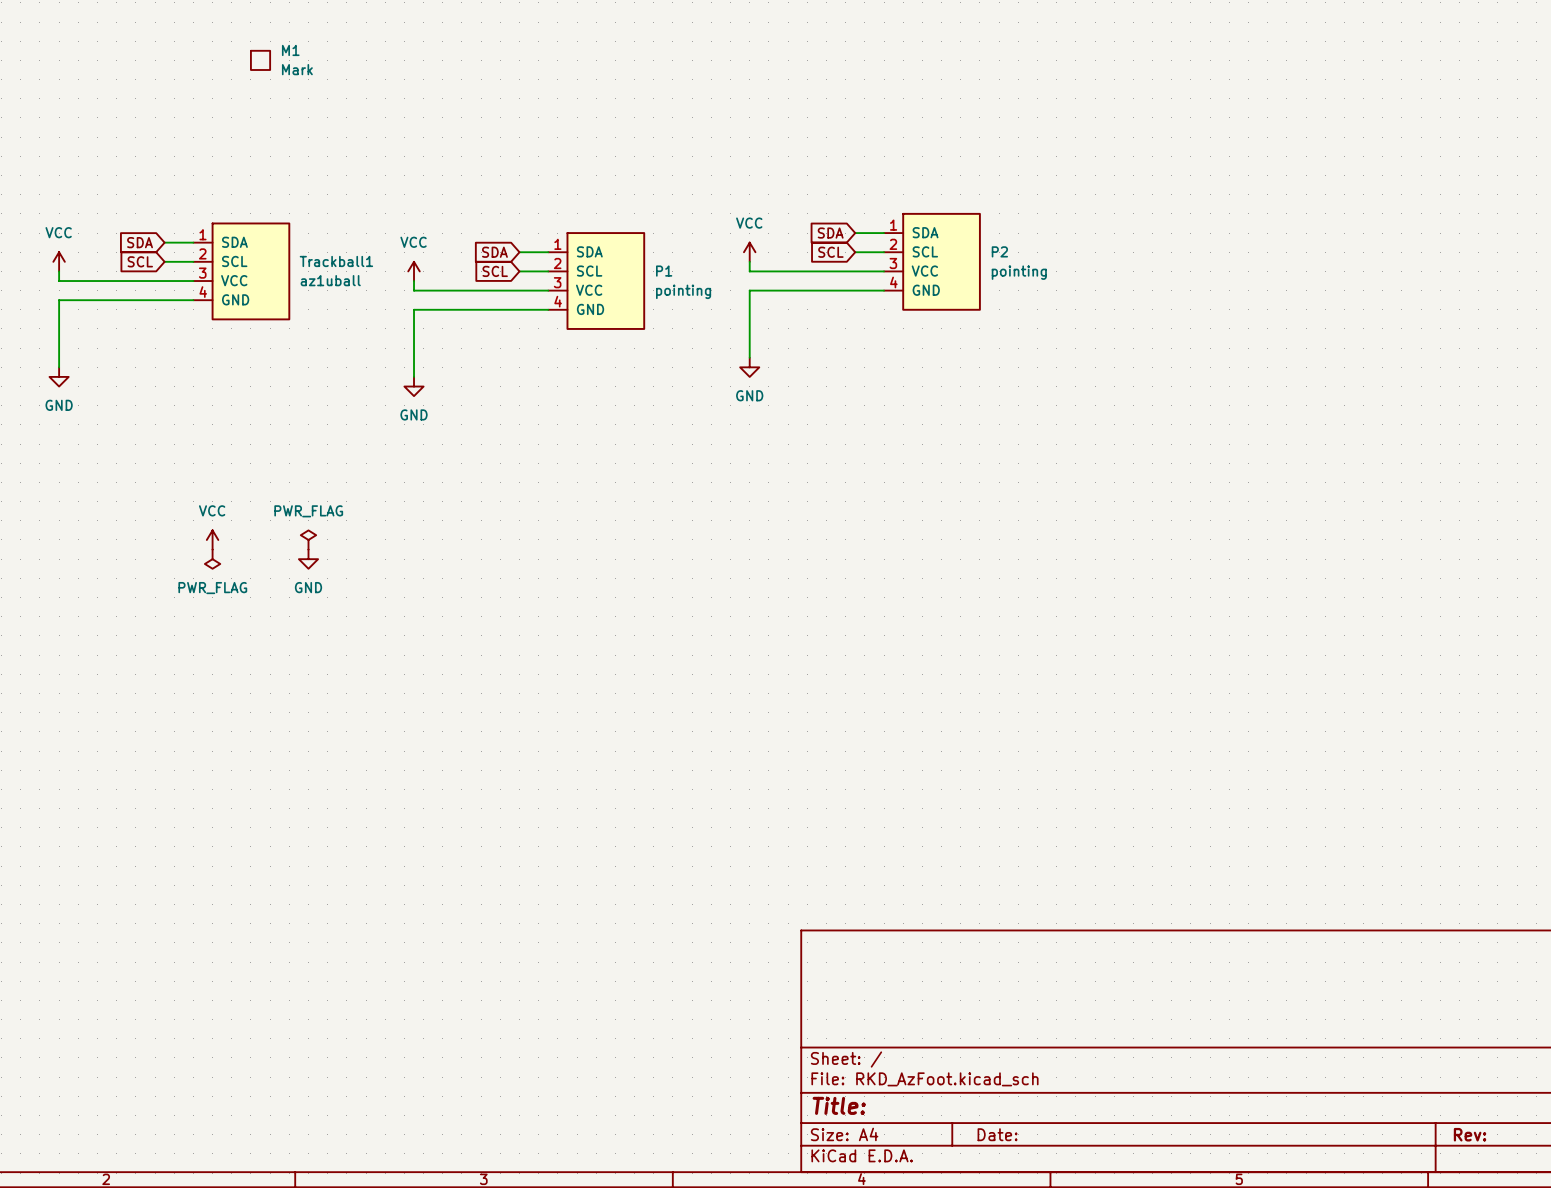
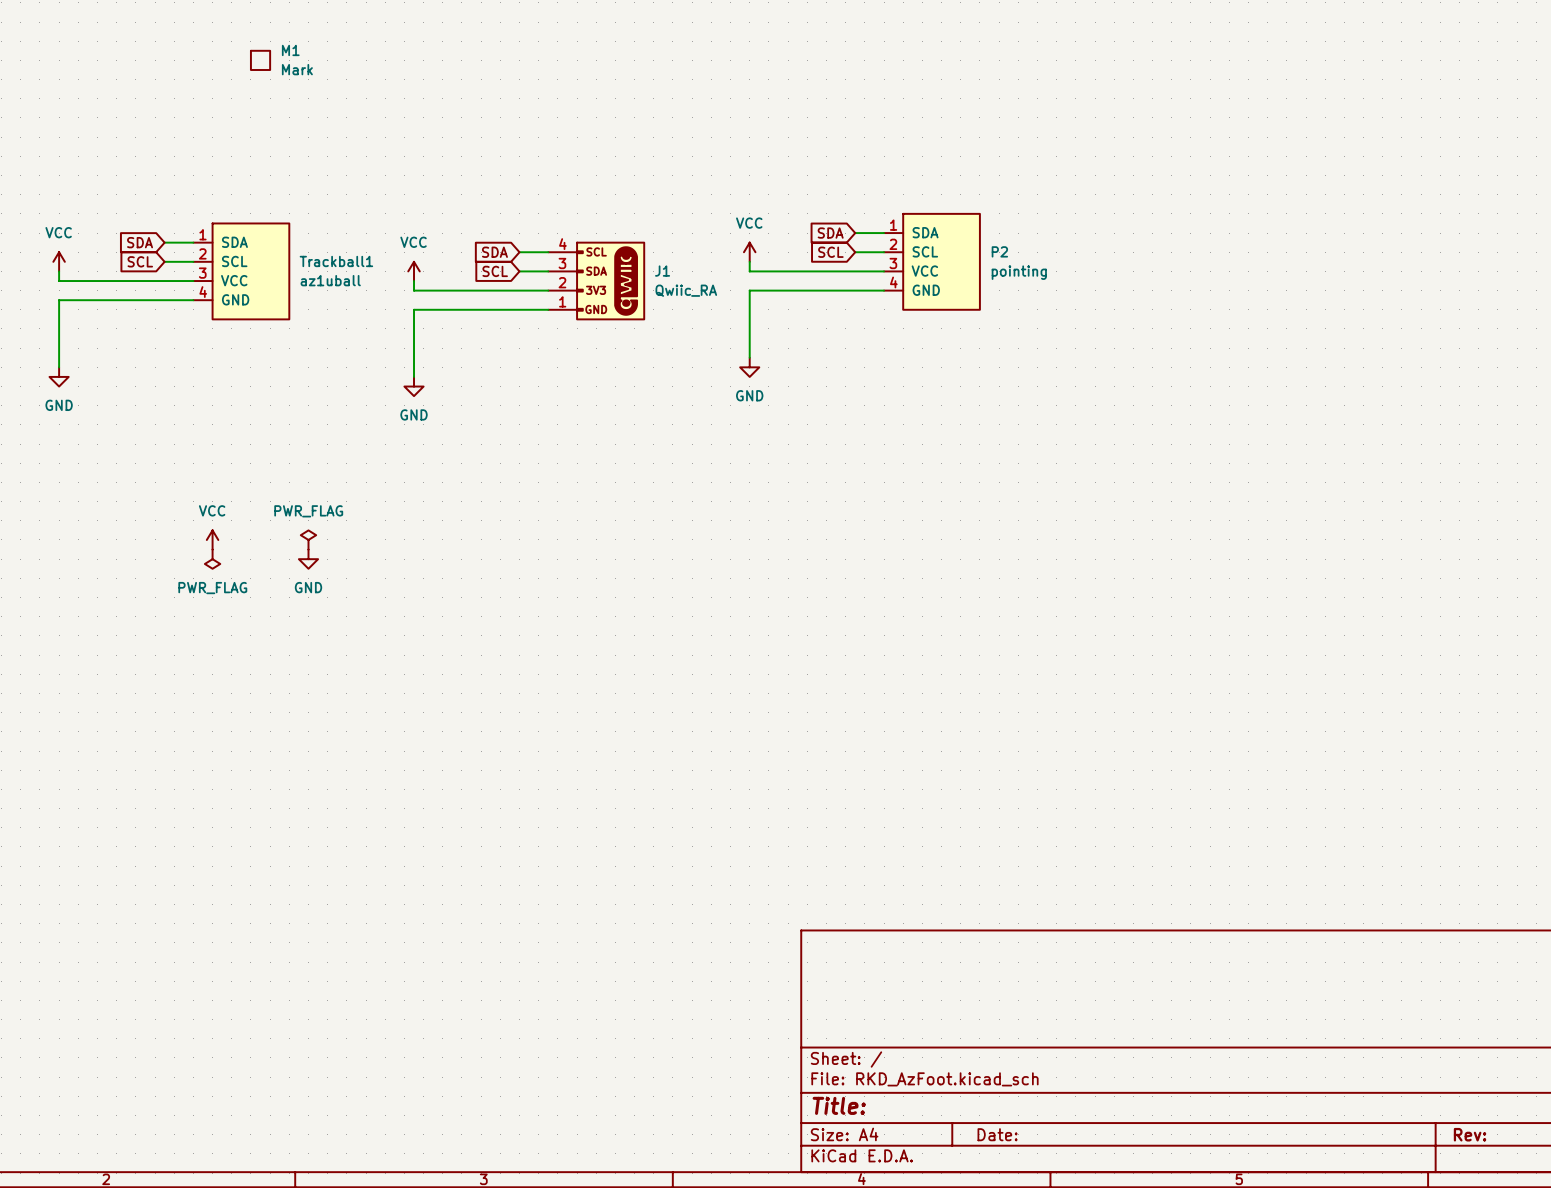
P1: pointing (596, 281) -> none
J1: none -> Qwiic_RA (596, 281)

